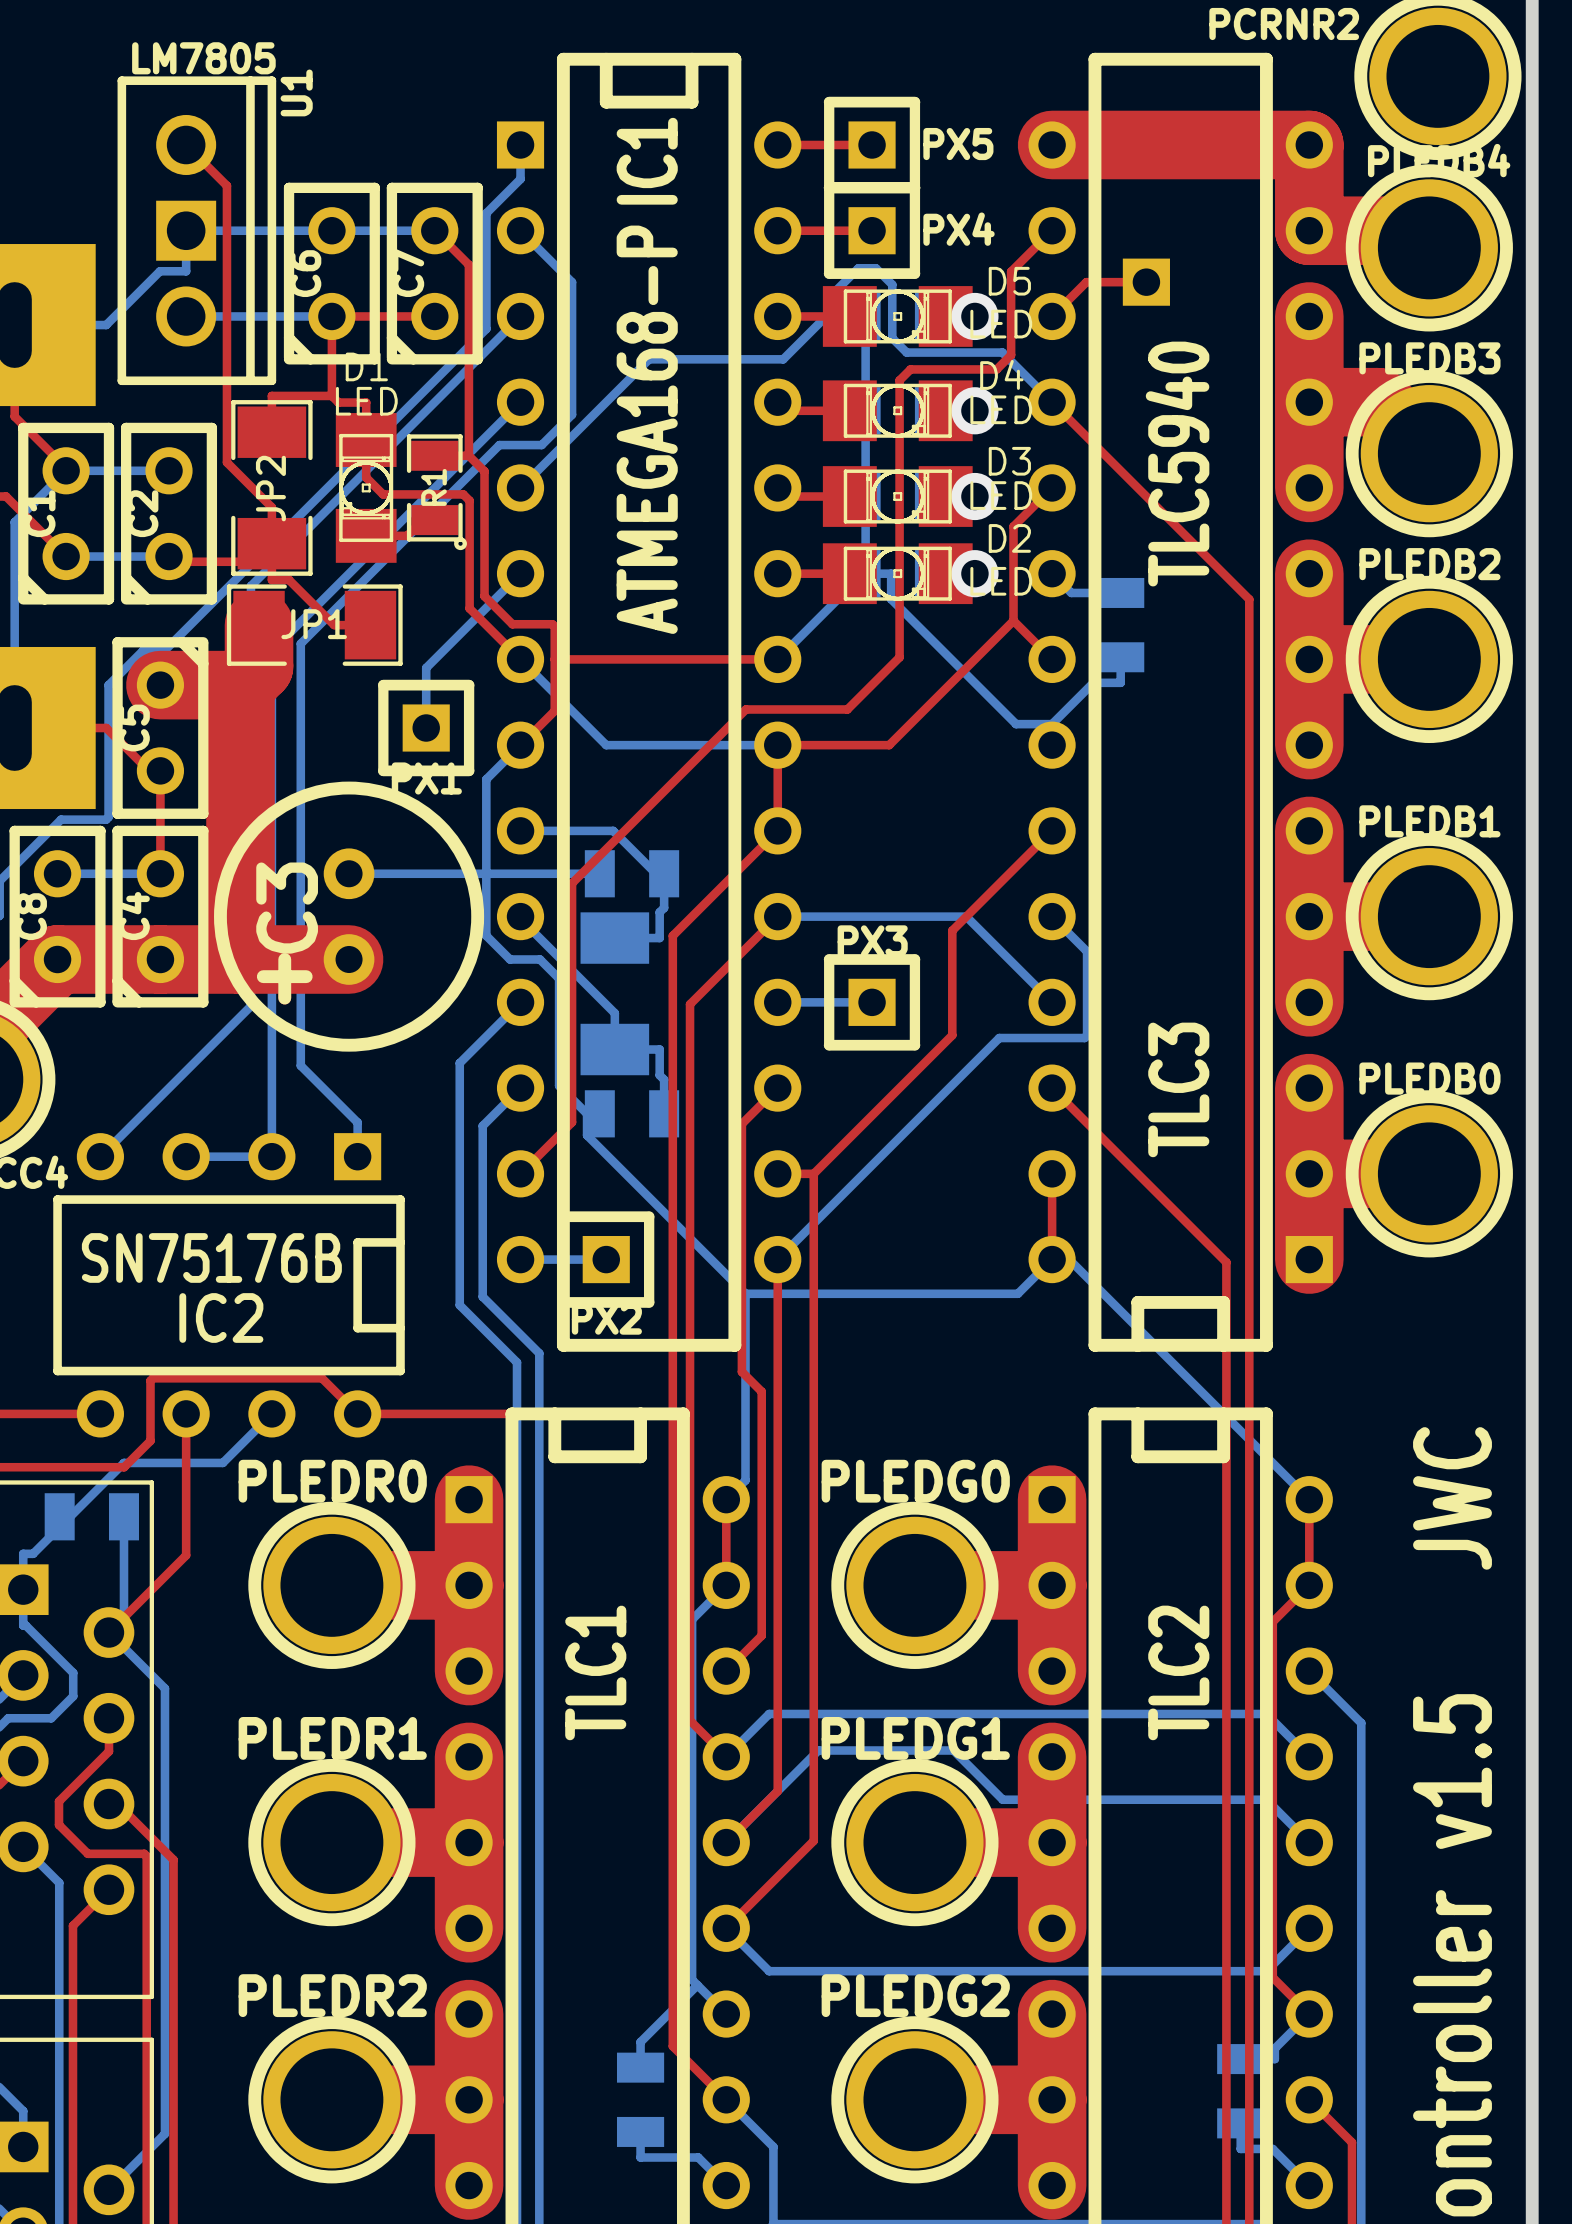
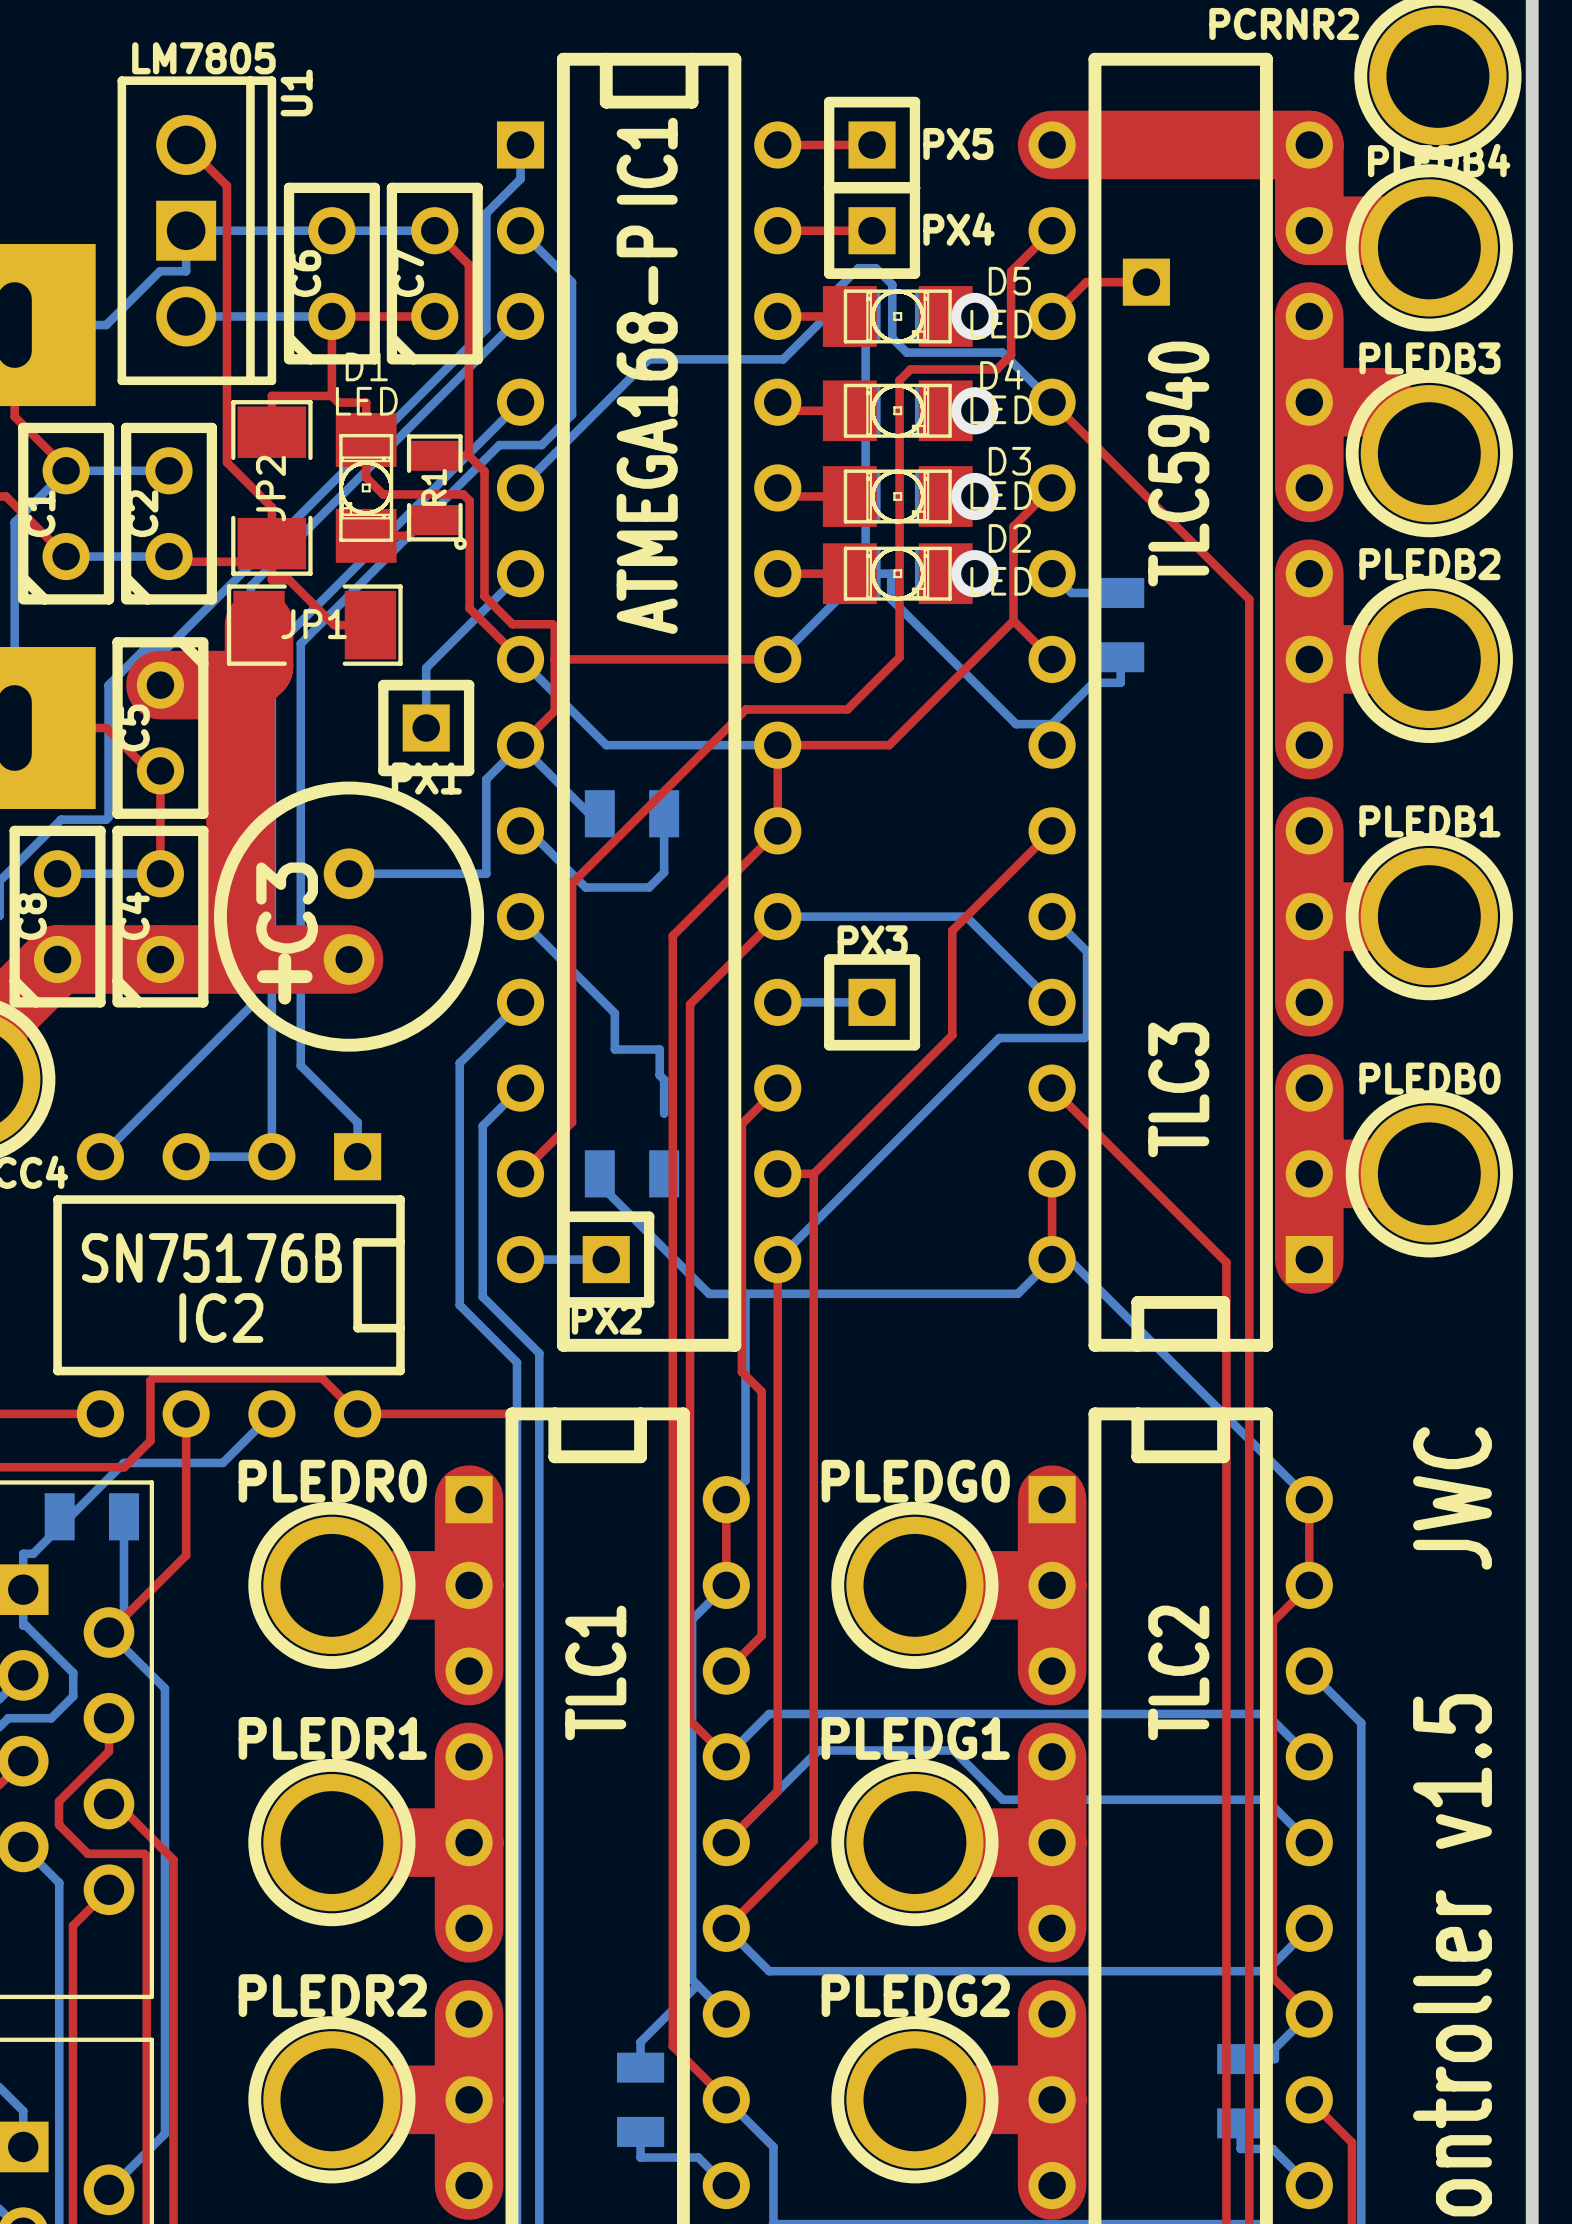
bottom track: none -> (520, 745) (589, 813) (599, 813)
bottom track: (529, 830) (613, 830) (664, 881) -> (529, 830) (585, 887) (649, 887) (664, 872) (664, 813)
bottom track: (599, 873) (486, 873) (486, 935) (510, 959) (539, 959) (559, 978) (559, 1085) (587, 1113) -> none
part position: (631, 873) -> (631, 813)
bottom track: (664, 873) (664, 907) (659, 912) (659, 938) (614, 938) -> none
part: (614, 993) -> none
bottom track: (587, 1113) (587, 1135) (745, 1293) -> (599, 1173) (599, 1184) (709, 1293) (745, 1293)
part position: (631, 1113) -> (631, 1173)

